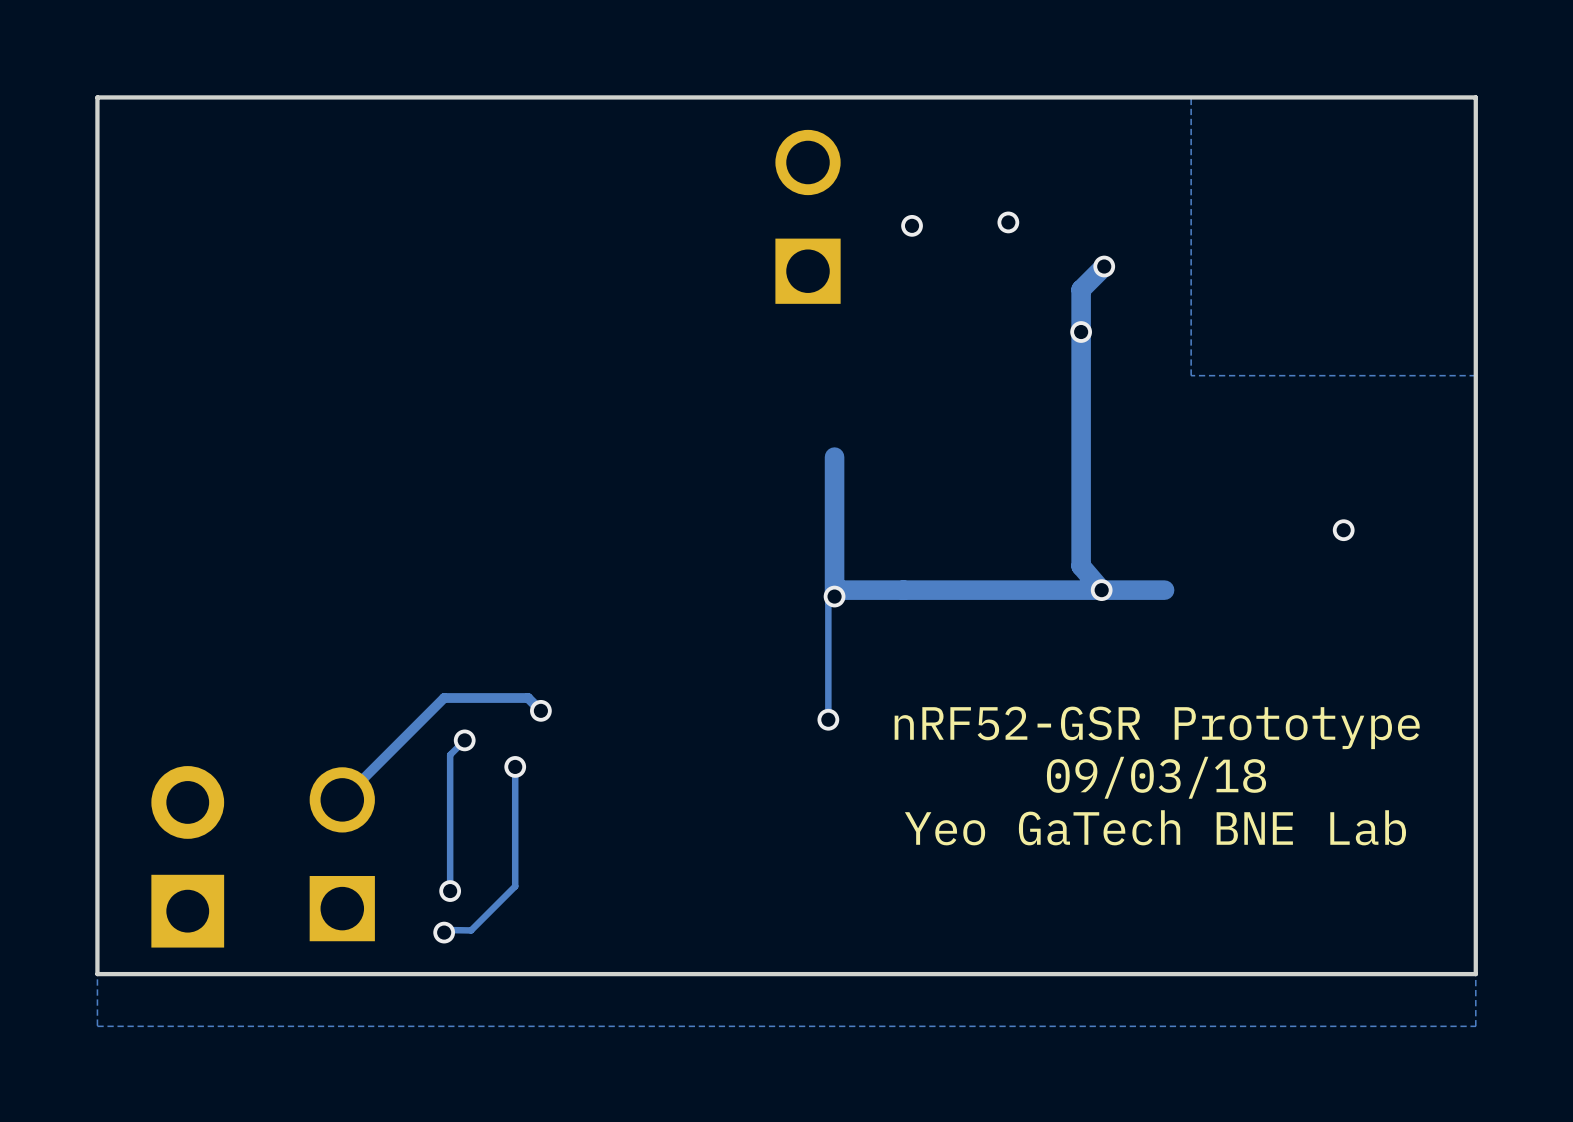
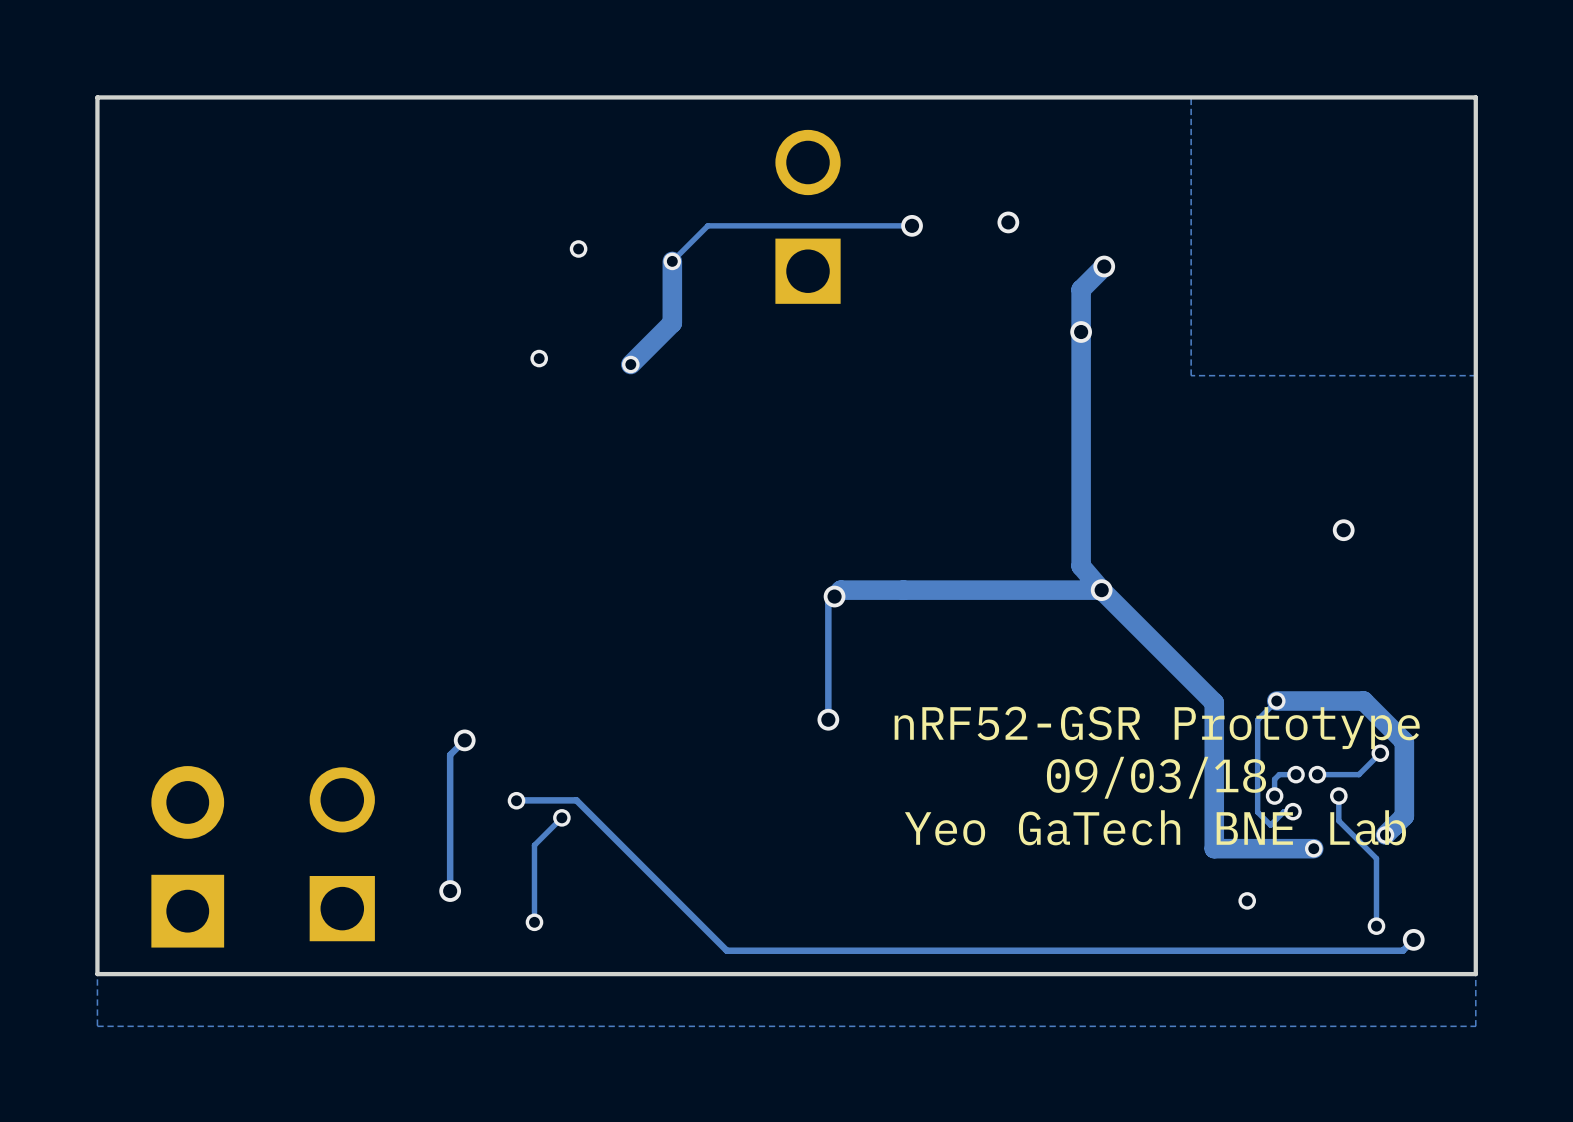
track: none -> (912, 225) (707, 225) (672, 261) (672, 323) (630, 364)
via: none -> (578, 248)
via: none -> (672, 261)
via: none -> (539, 358)
via: none -> (630, 364)
track: (834, 457) (834, 596) -> none
track: (1164, 590) (1101, 590) -> (1313, 848) (1214, 848) (1214, 702) (1101, 590)
via: none -> (1276, 701)
track: (540, 710) (528, 698) (444, 698) (342, 799) -> none
via: (540, 710) -> none
track: none -> (1380, 753) (1358, 774) (1317, 774)
via: none -> (1380, 753)
track: (515, 766) (515, 886) (471, 930) (446, 930) (444, 932) -> none
via: (515, 766) -> none
track: none -> (1296, 774) (1279, 774) (1274, 779) (1274, 796)
via: none -> (1296, 774)
via: none -> (1317, 774)
via: none -> (1274, 796)
track: none -> (1338, 796) (1338, 820) (1376, 858) (1376, 926)
via: none -> (1338, 796)
track: none -> (516, 800) (576, 800) (726, 950) (1402, 950) (1413, 939)
via: none -> (516, 800)
track: none -> (1292, 811) (1284, 811) (1270, 825) (1257, 812) (1257, 720) (1276, 701) (1363, 701) (1404, 741) (1404, 816) (1385, 834)
via: none -> (1292, 811)
track: none -> (561, 817) (534, 845) (534, 922)
via: none -> (561, 817)
via: none -> (1385, 834)
via: none -> (1313, 848)
via: none -> (1247, 900)
via: none -> (534, 922)
via: none -> (1376, 926)
via: (444, 932) -> none
via: none -> (1413, 939)

